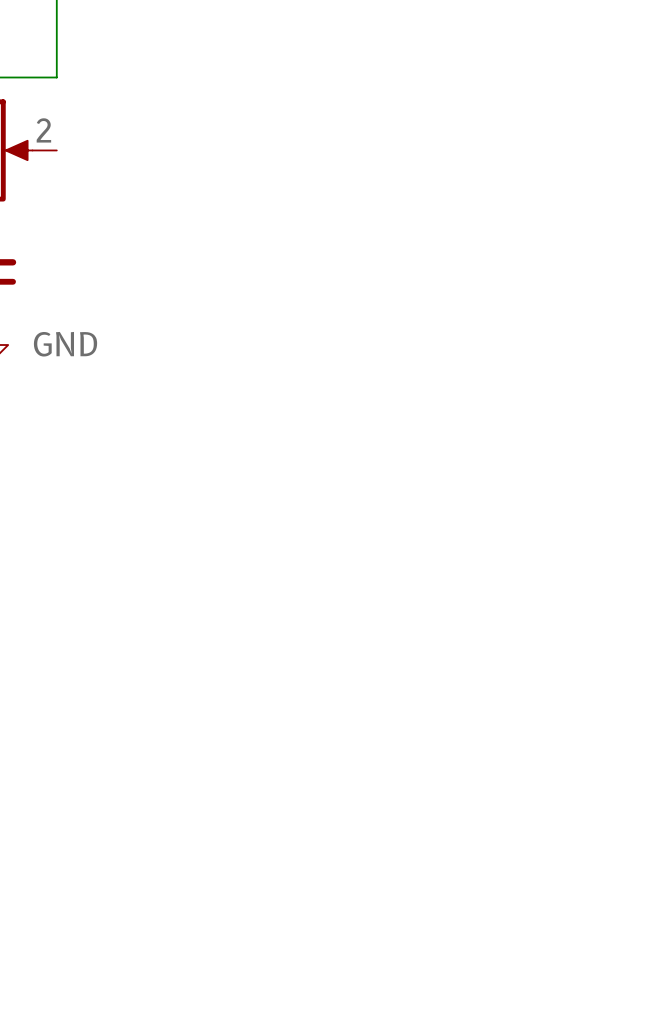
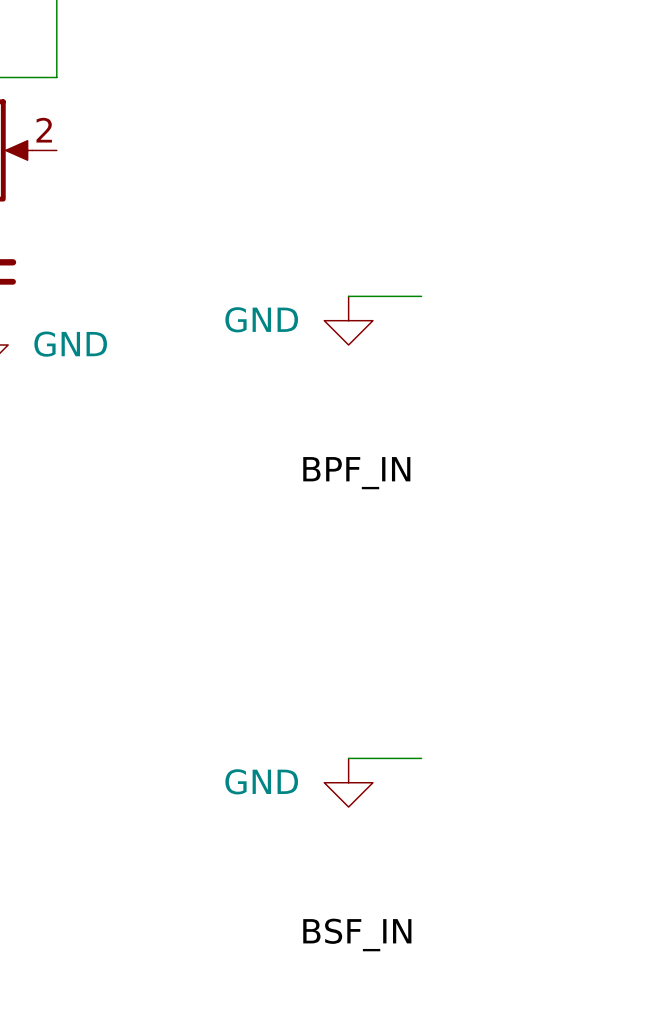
wire: none -> (348, 296) (421, 296)
power symbol: none -> GND (348, 320)
label: none -> BPF_IN (356, 473)
wire: none -> (348, 758) (421, 758)
power symbol: none -> GND (348, 782)
label: none -> BSF_IN (357, 934)

